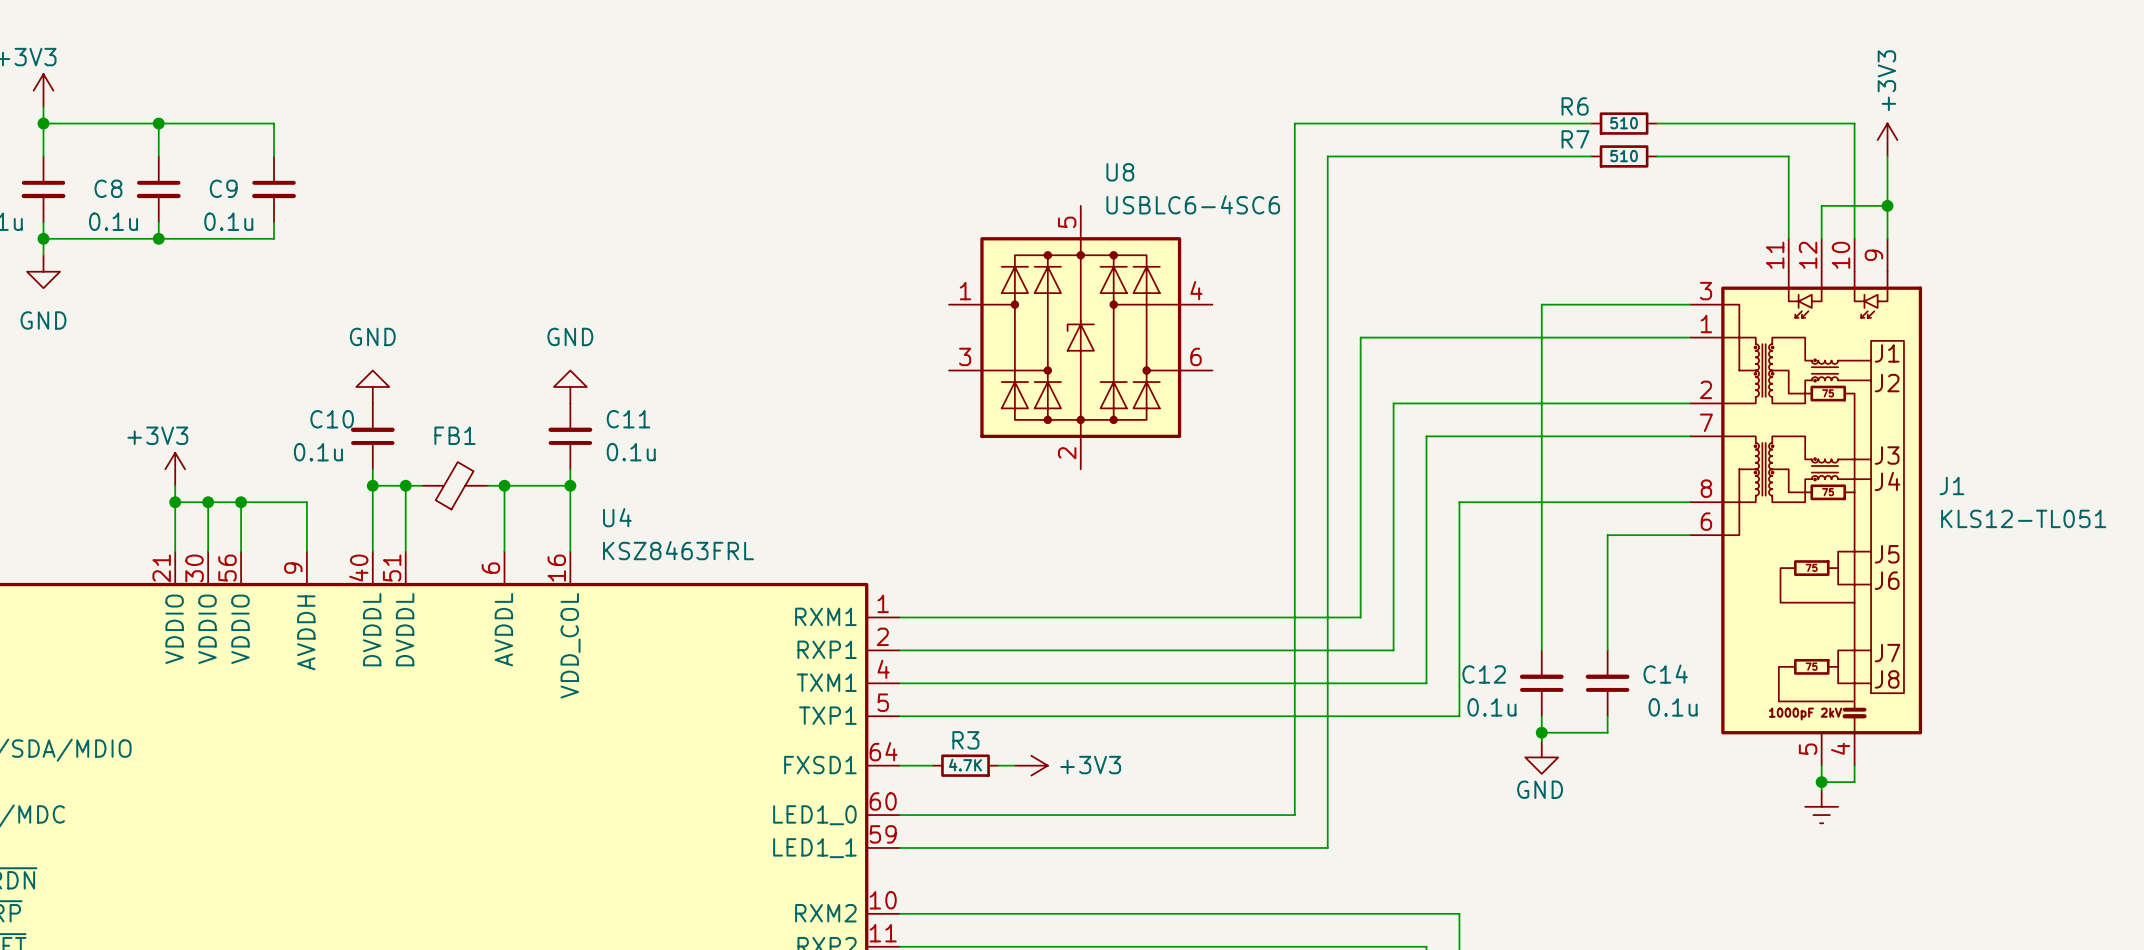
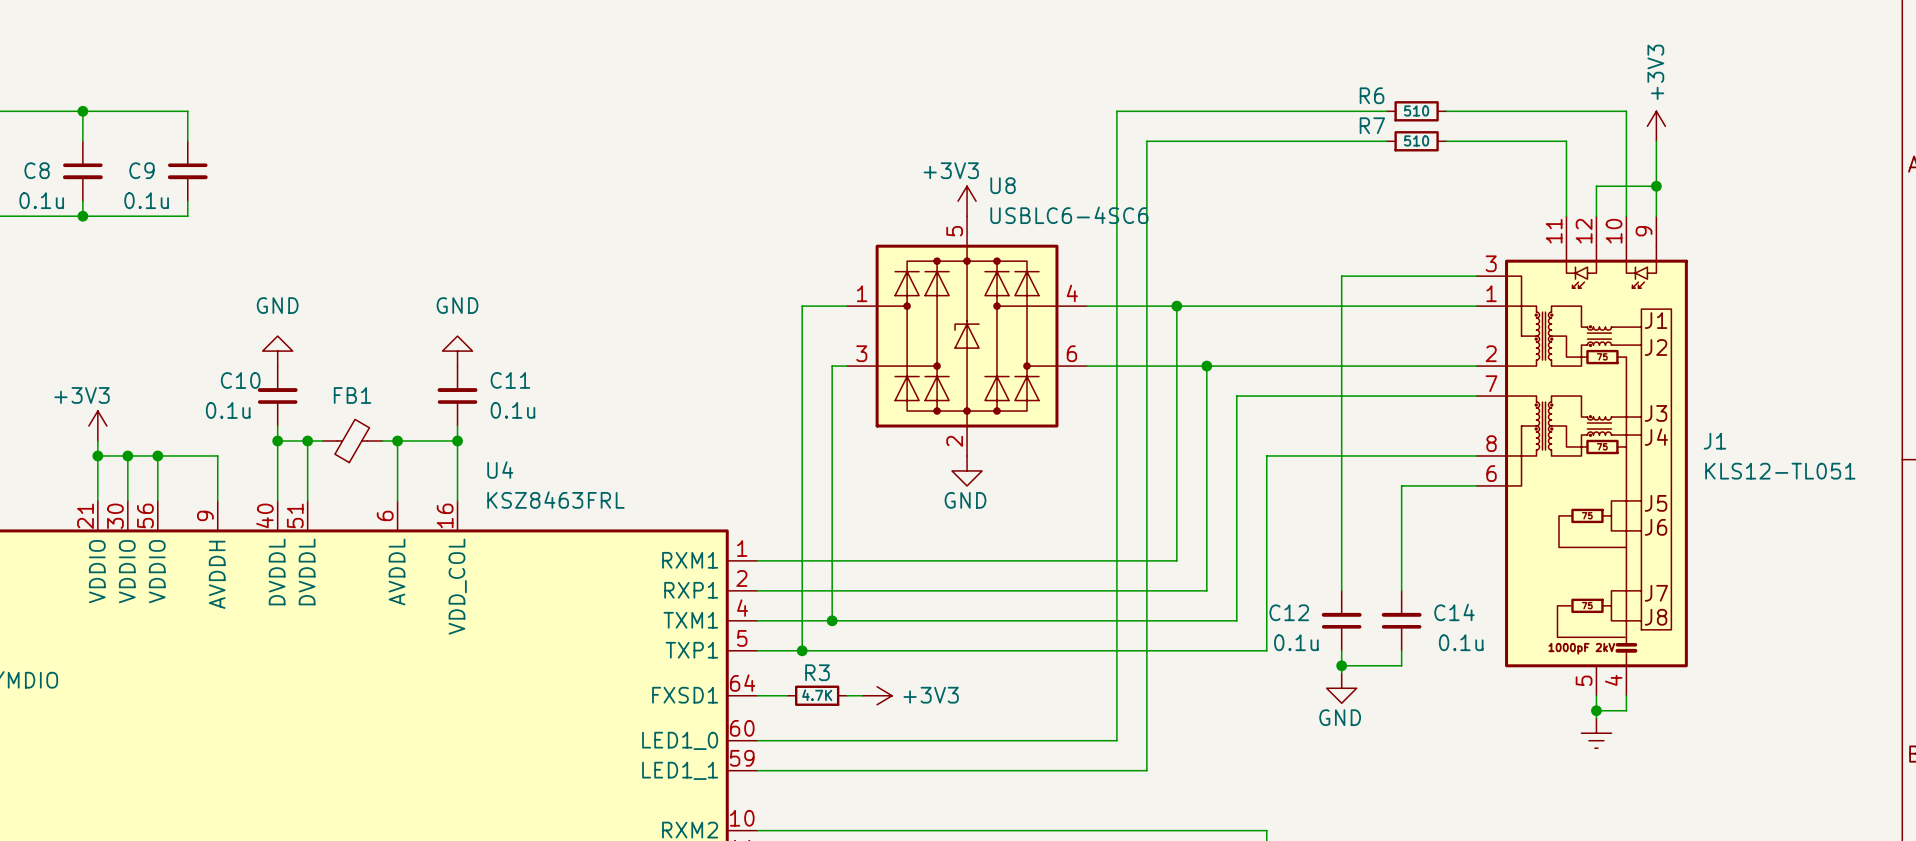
power symbol: none -> +3V3 (967, 201)
wire: none -> (847, 306) (802, 306) (802, 650)
U8 position: (1080, 337) -> (967, 336)
wire: none -> (1086, 306) (1176, 306)
junction: none -> (1176, 306)
wire: none -> (847, 366) (832, 366) (832, 620)
wire: none -> (1086, 366) (1206, 366)
junction: none -> (1206, 366)
power symbol: none -> GND (967, 470)
junction: none -> (832, 620)
junction: none -> (802, 650)

